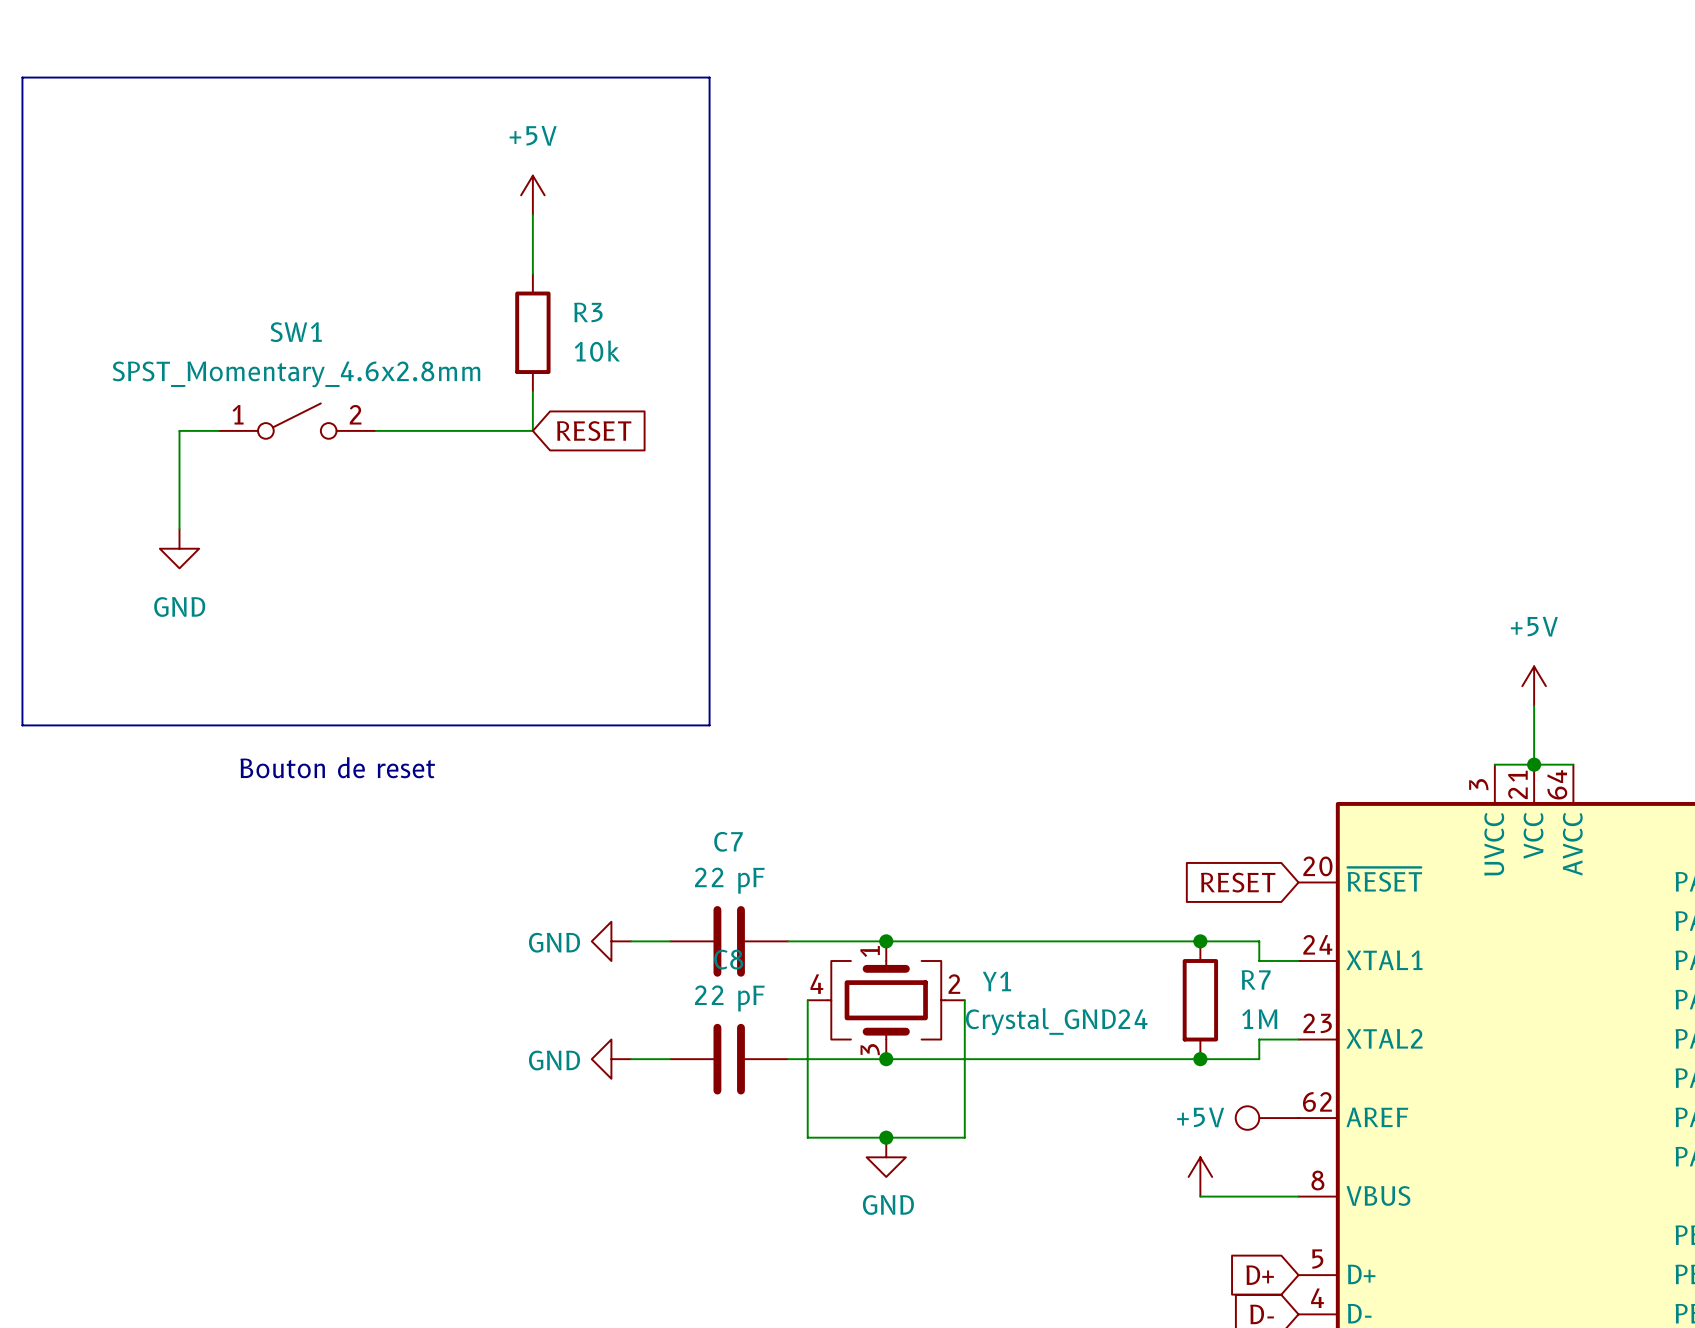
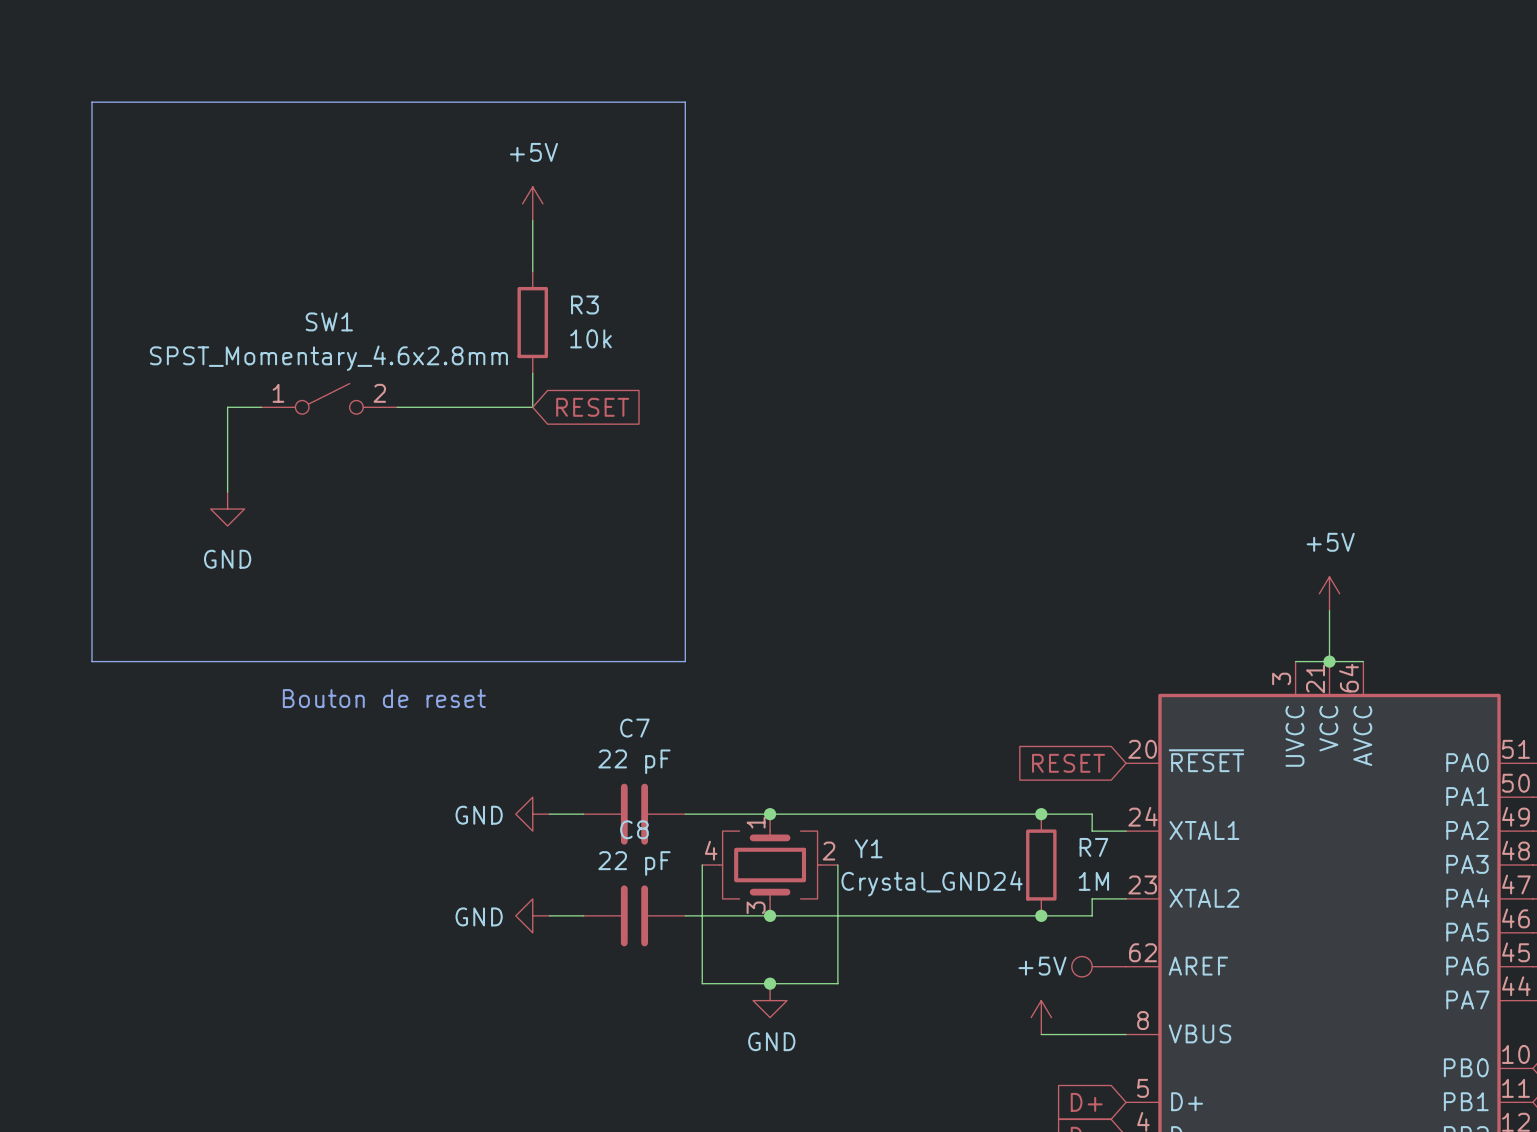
line: (22, 77) (709, 77) (709, 725) (22, 725) (22, 77) -> (91, 102) (91, 661) (685, 661) (685, 102) (91, 102)
power symbol position: +5V (532, 195) -> +5V (532, 203)
wire: (532, 214) (532, 273) -> (532, 220) (532, 271)
R3 position: (532, 332) -> (532, 322)
wire: (532, 391) (532, 430) (375, 430) -> (532, 373) (532, 407) (397, 407)
SW1 position: (297, 421) -> (329, 398)
wire: (218, 430) (179, 430) (179, 529) -> (261, 407) (227, 407) (227, 492)
global label position: RESET (594, 431) -> RESET (592, 407)
power symbol position: GND (179, 548) -> GND (227, 509)
text position: Bouton de reset (337, 767) -> Bouton de reset (384, 698)

